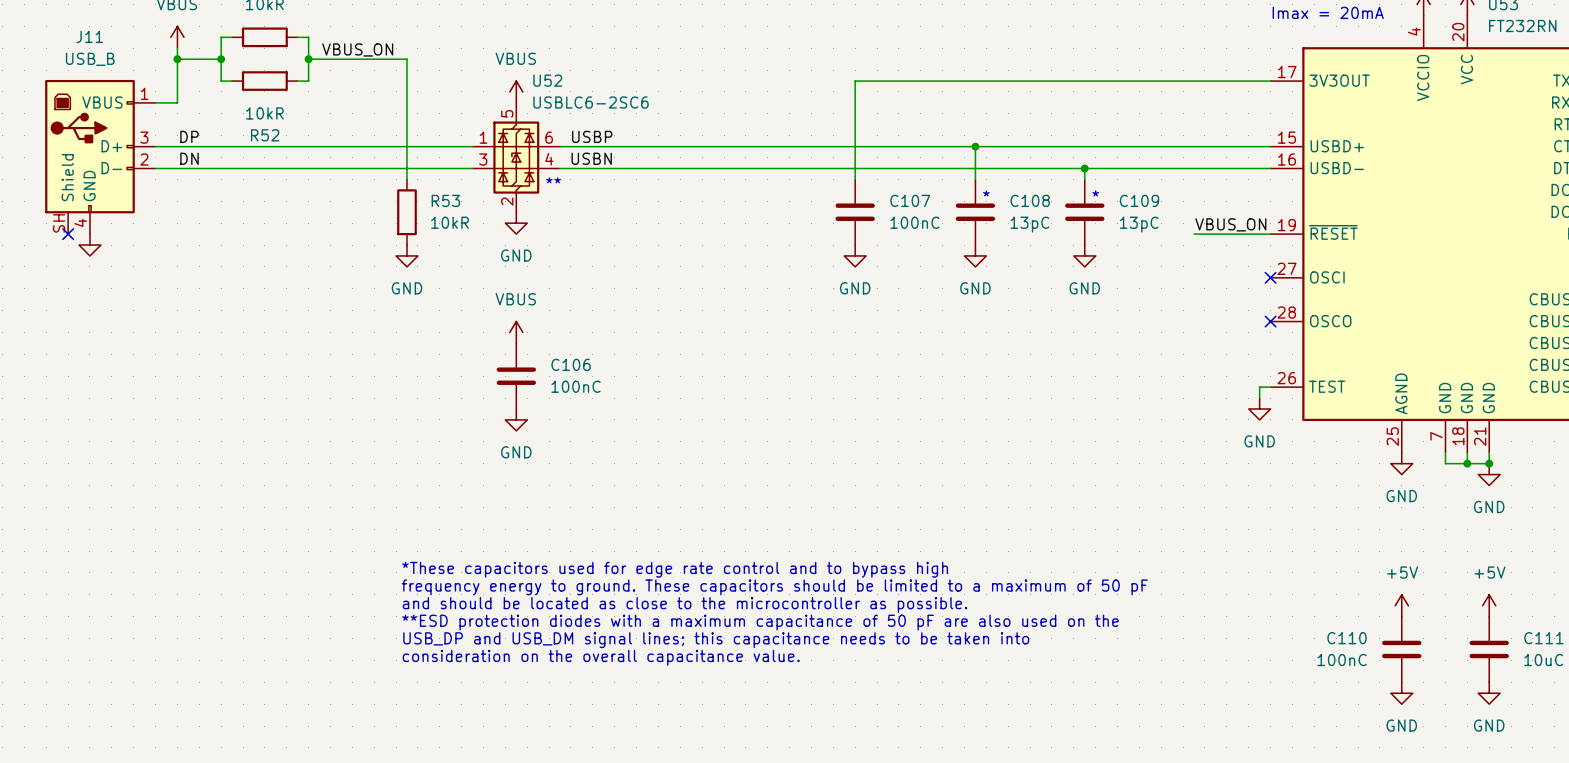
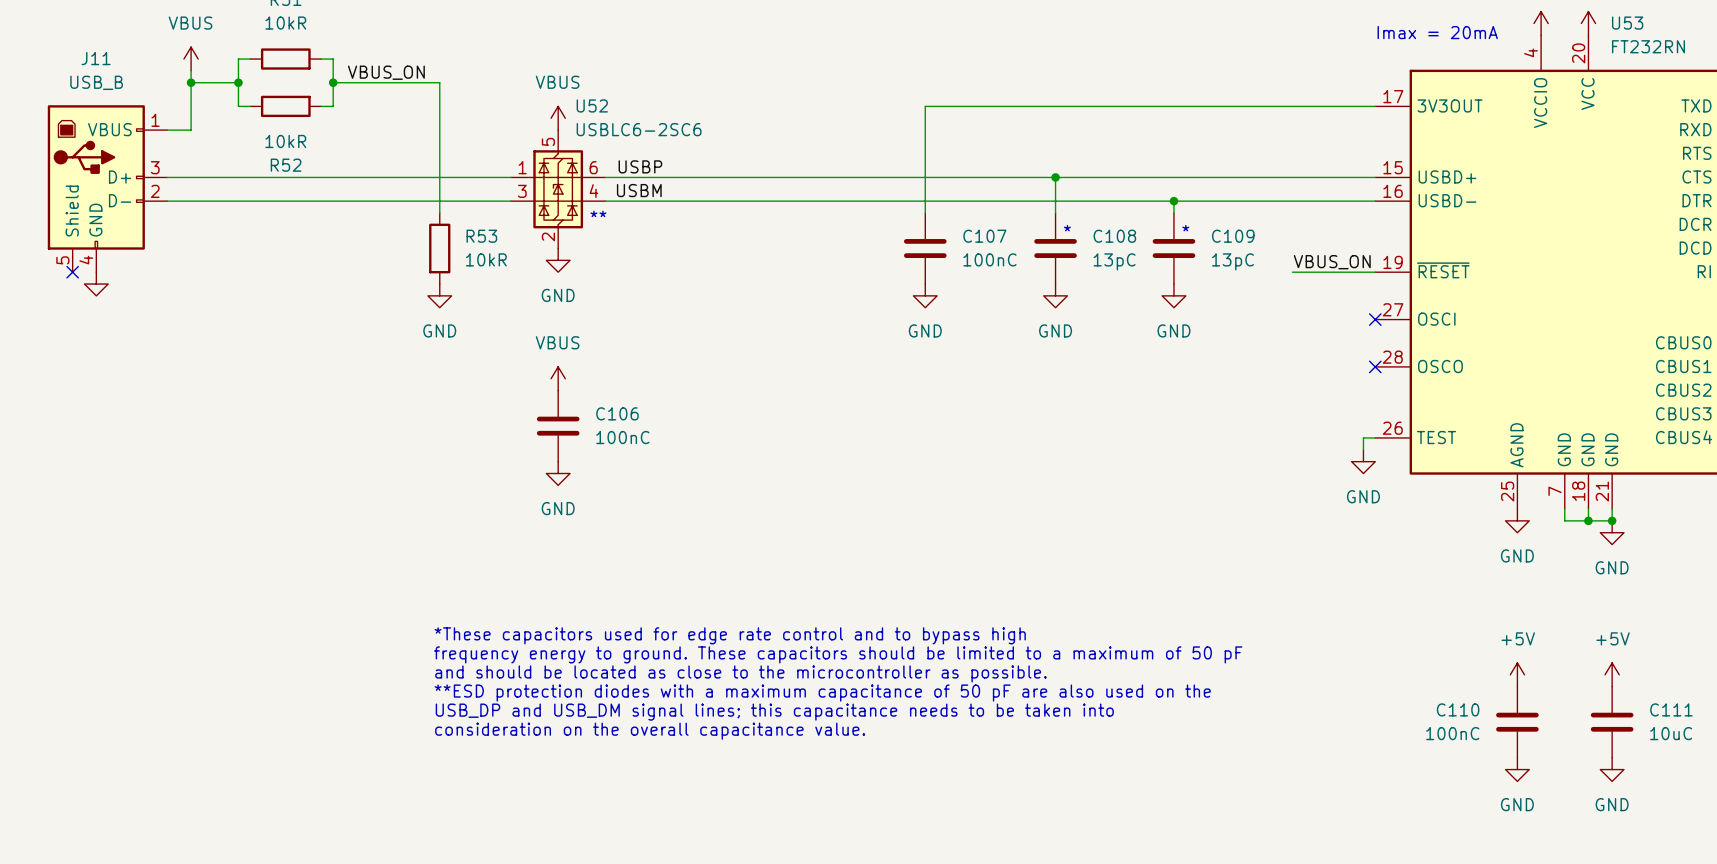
label: DP (189, 136) -> none
label: DN (189, 158) -> none
label: USBN (591, 158) -> USBM (639, 190)
J11 pin number: SH (59, 223) -> 5 (62, 260)

